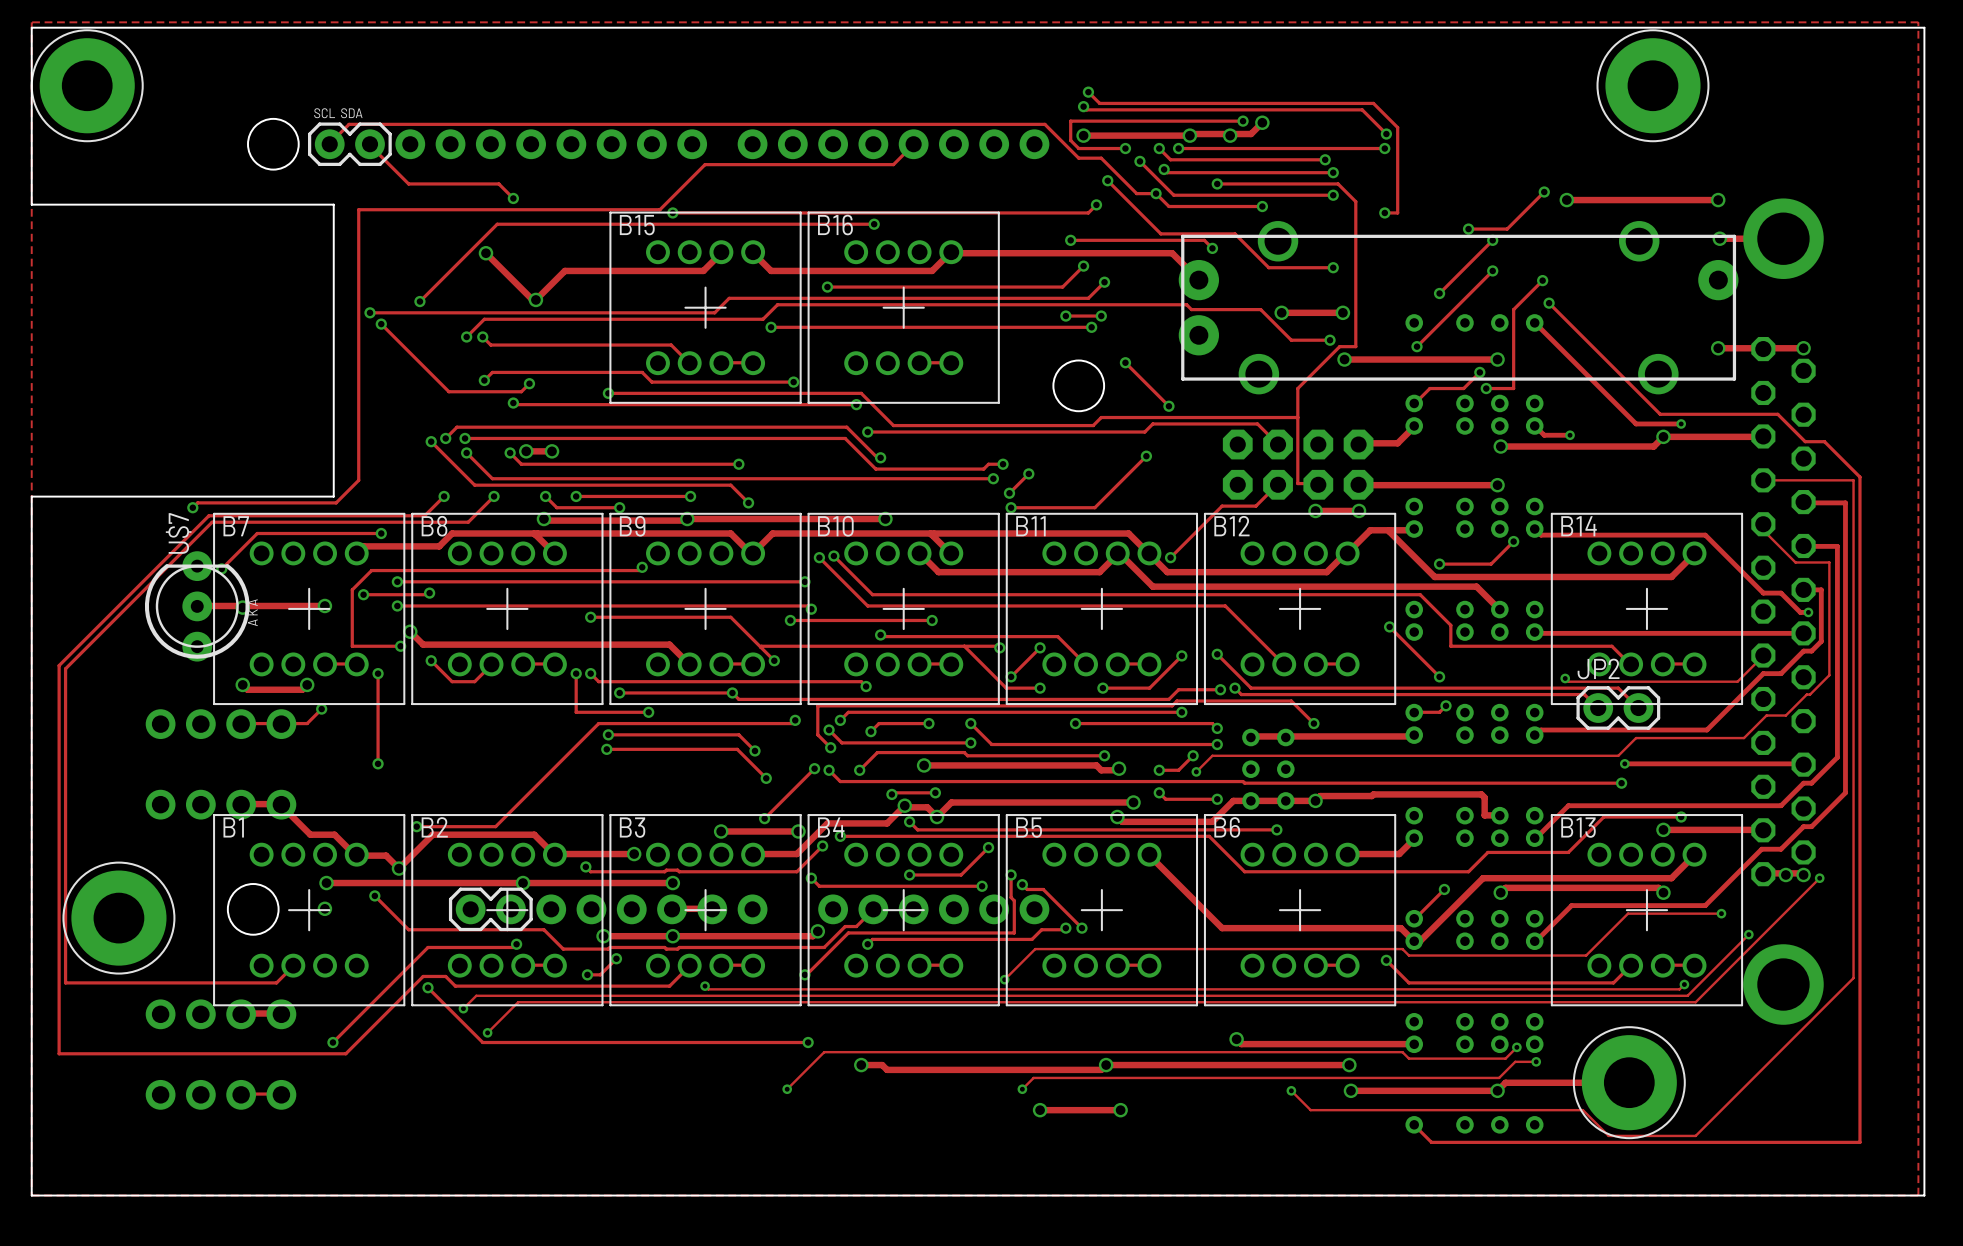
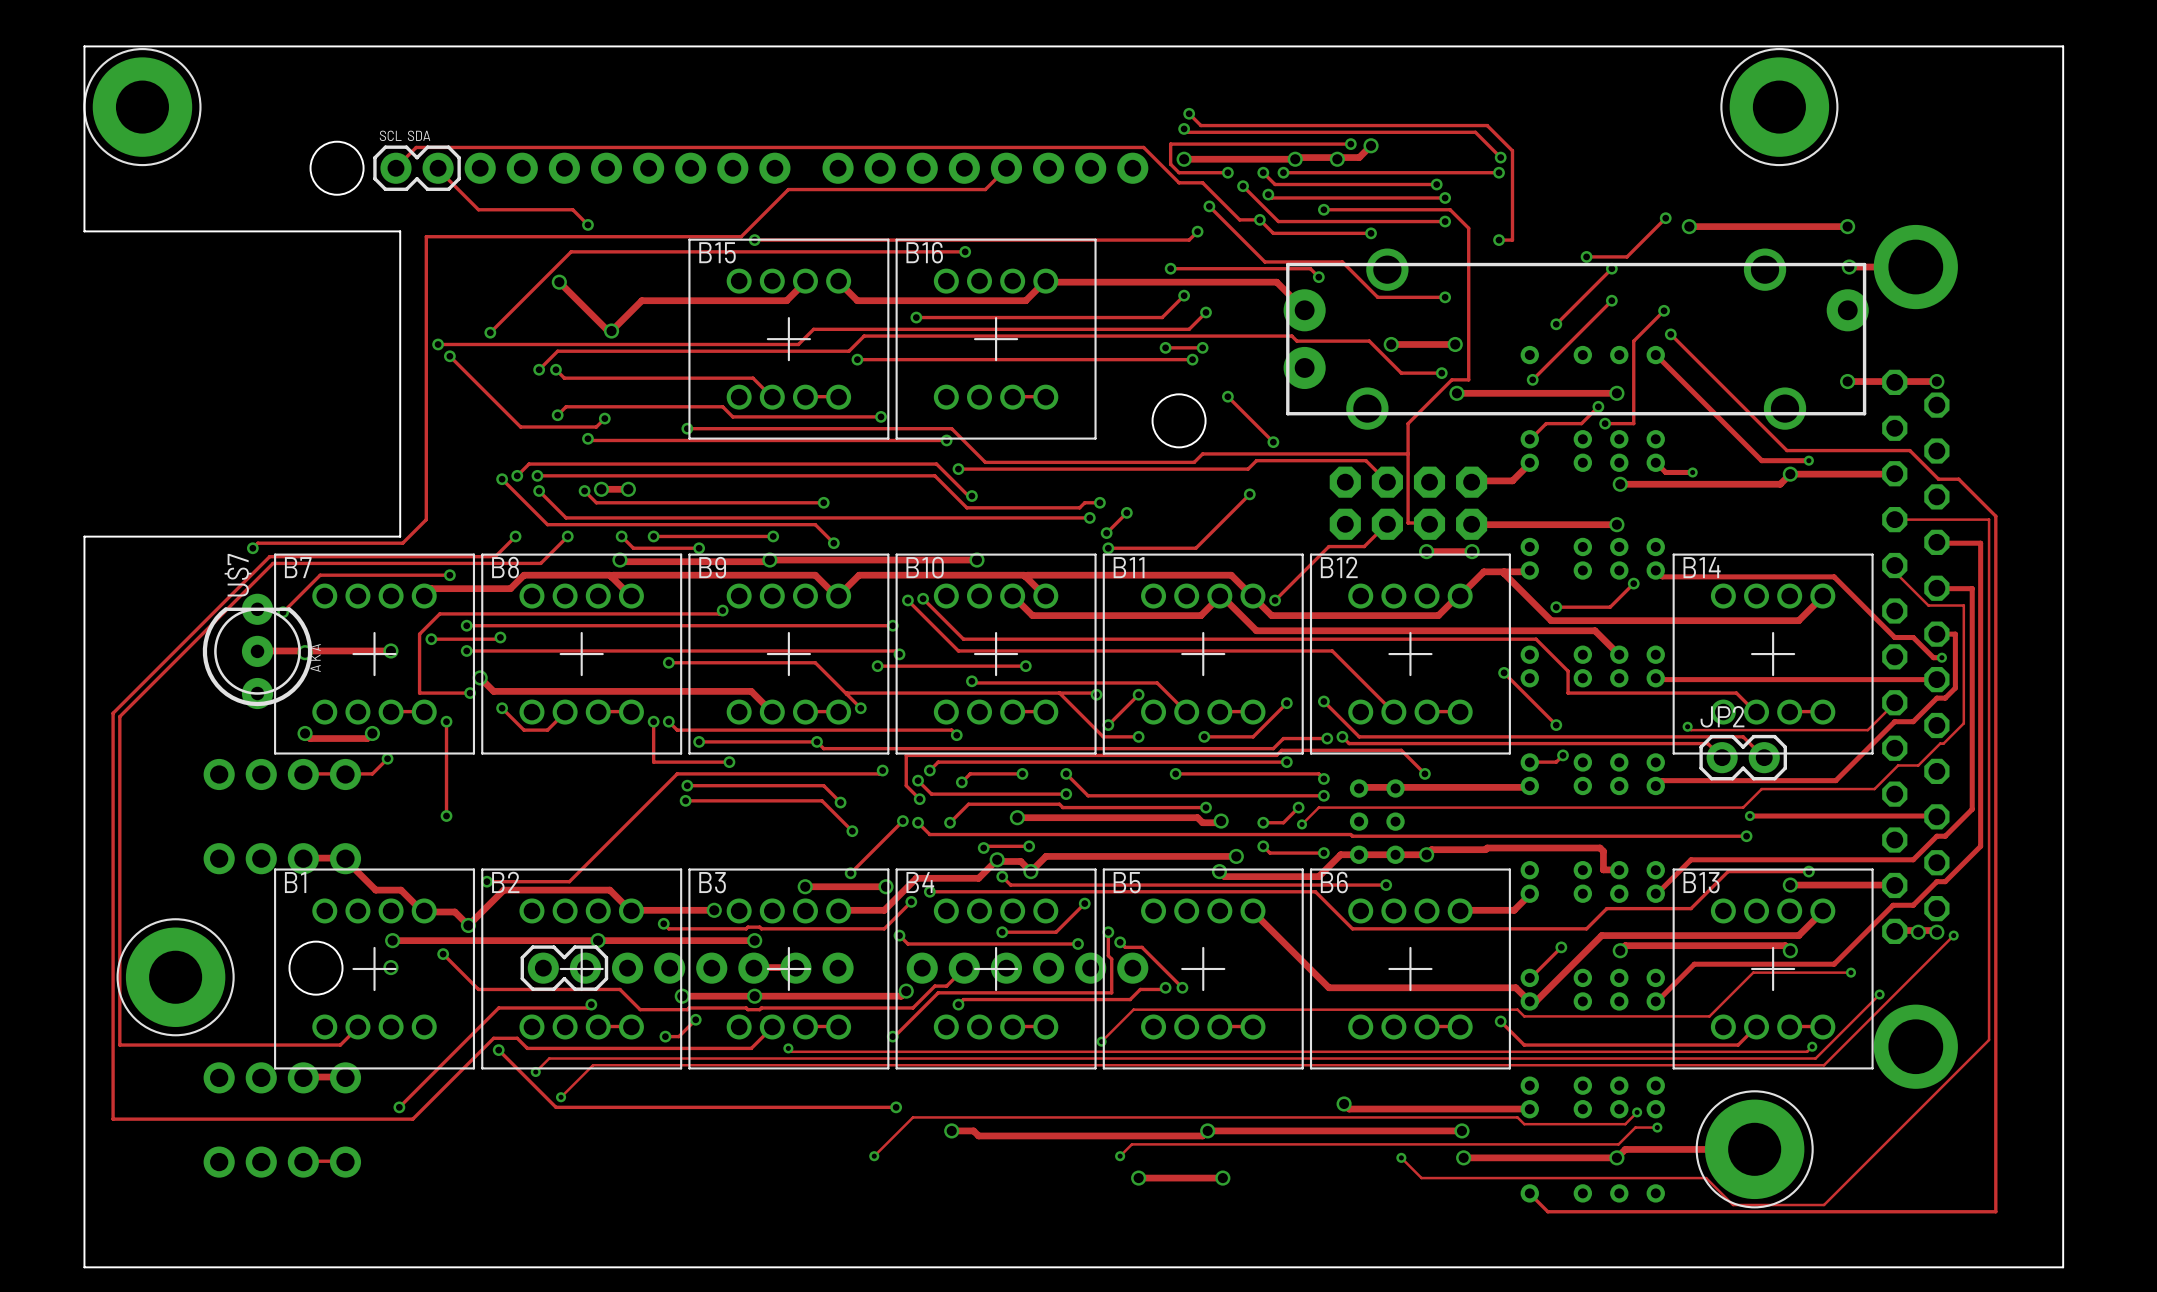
zone outline: (31, 22) (1918, 22) (1918, 1195) (31, 1195) (31, 22) -> none

